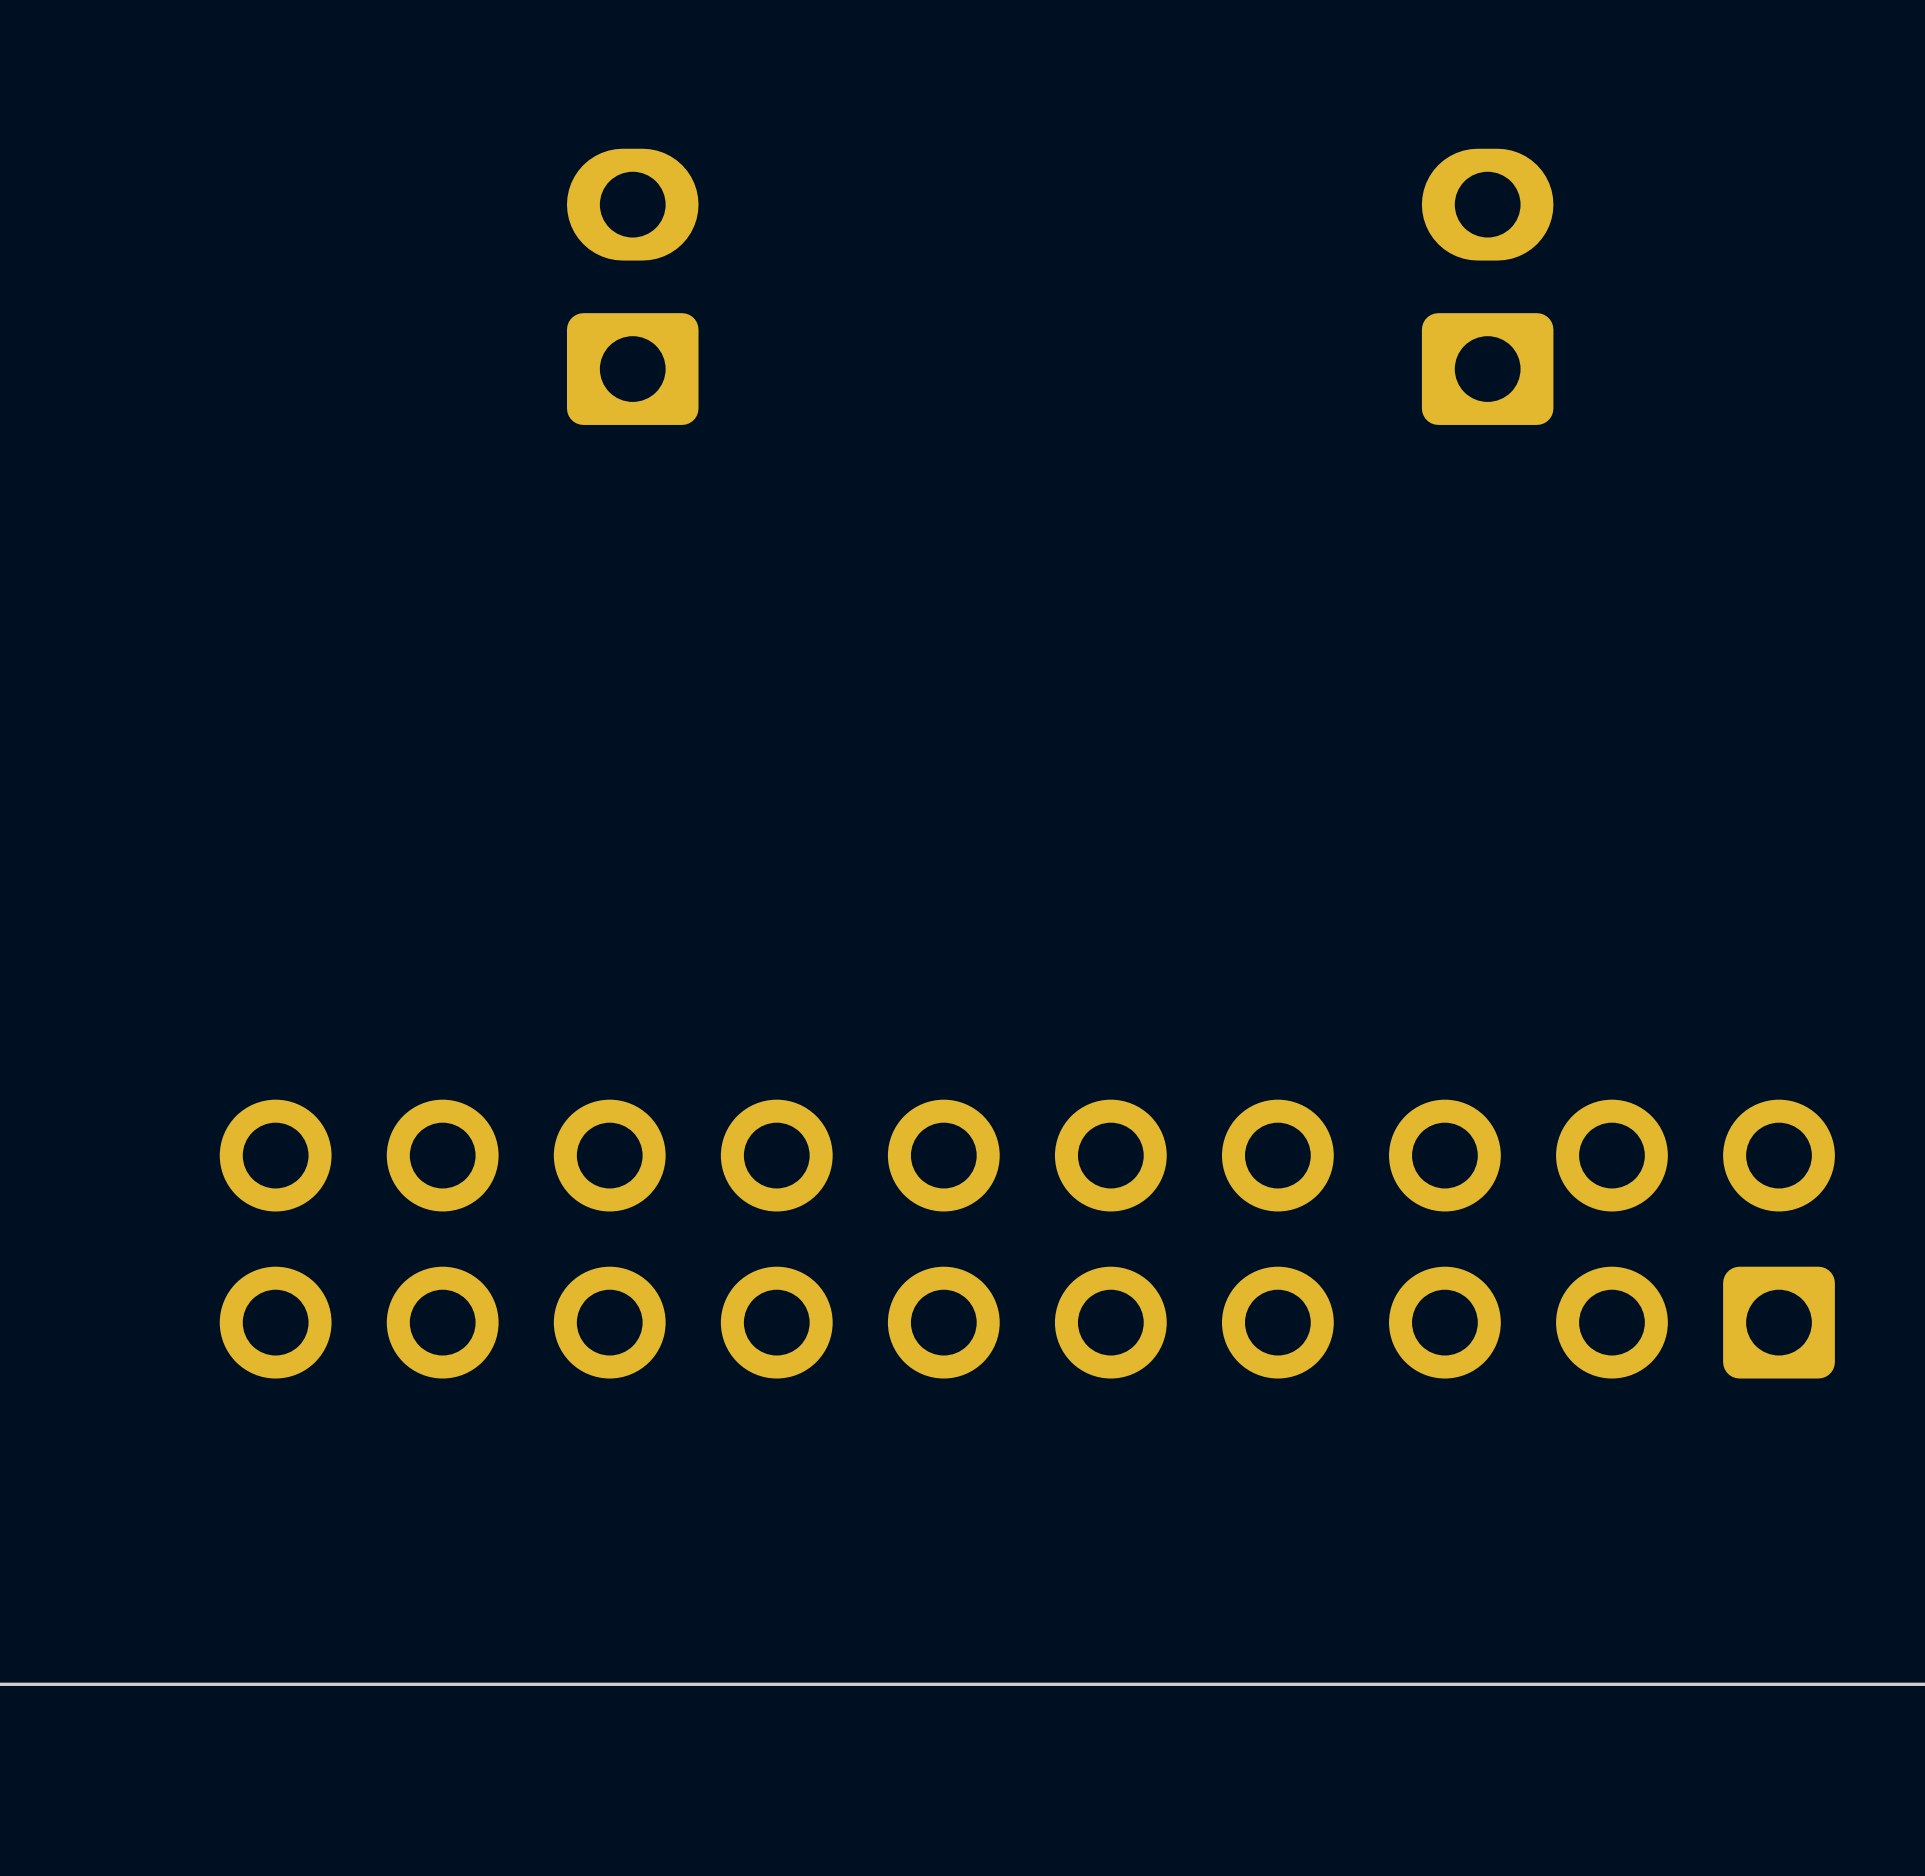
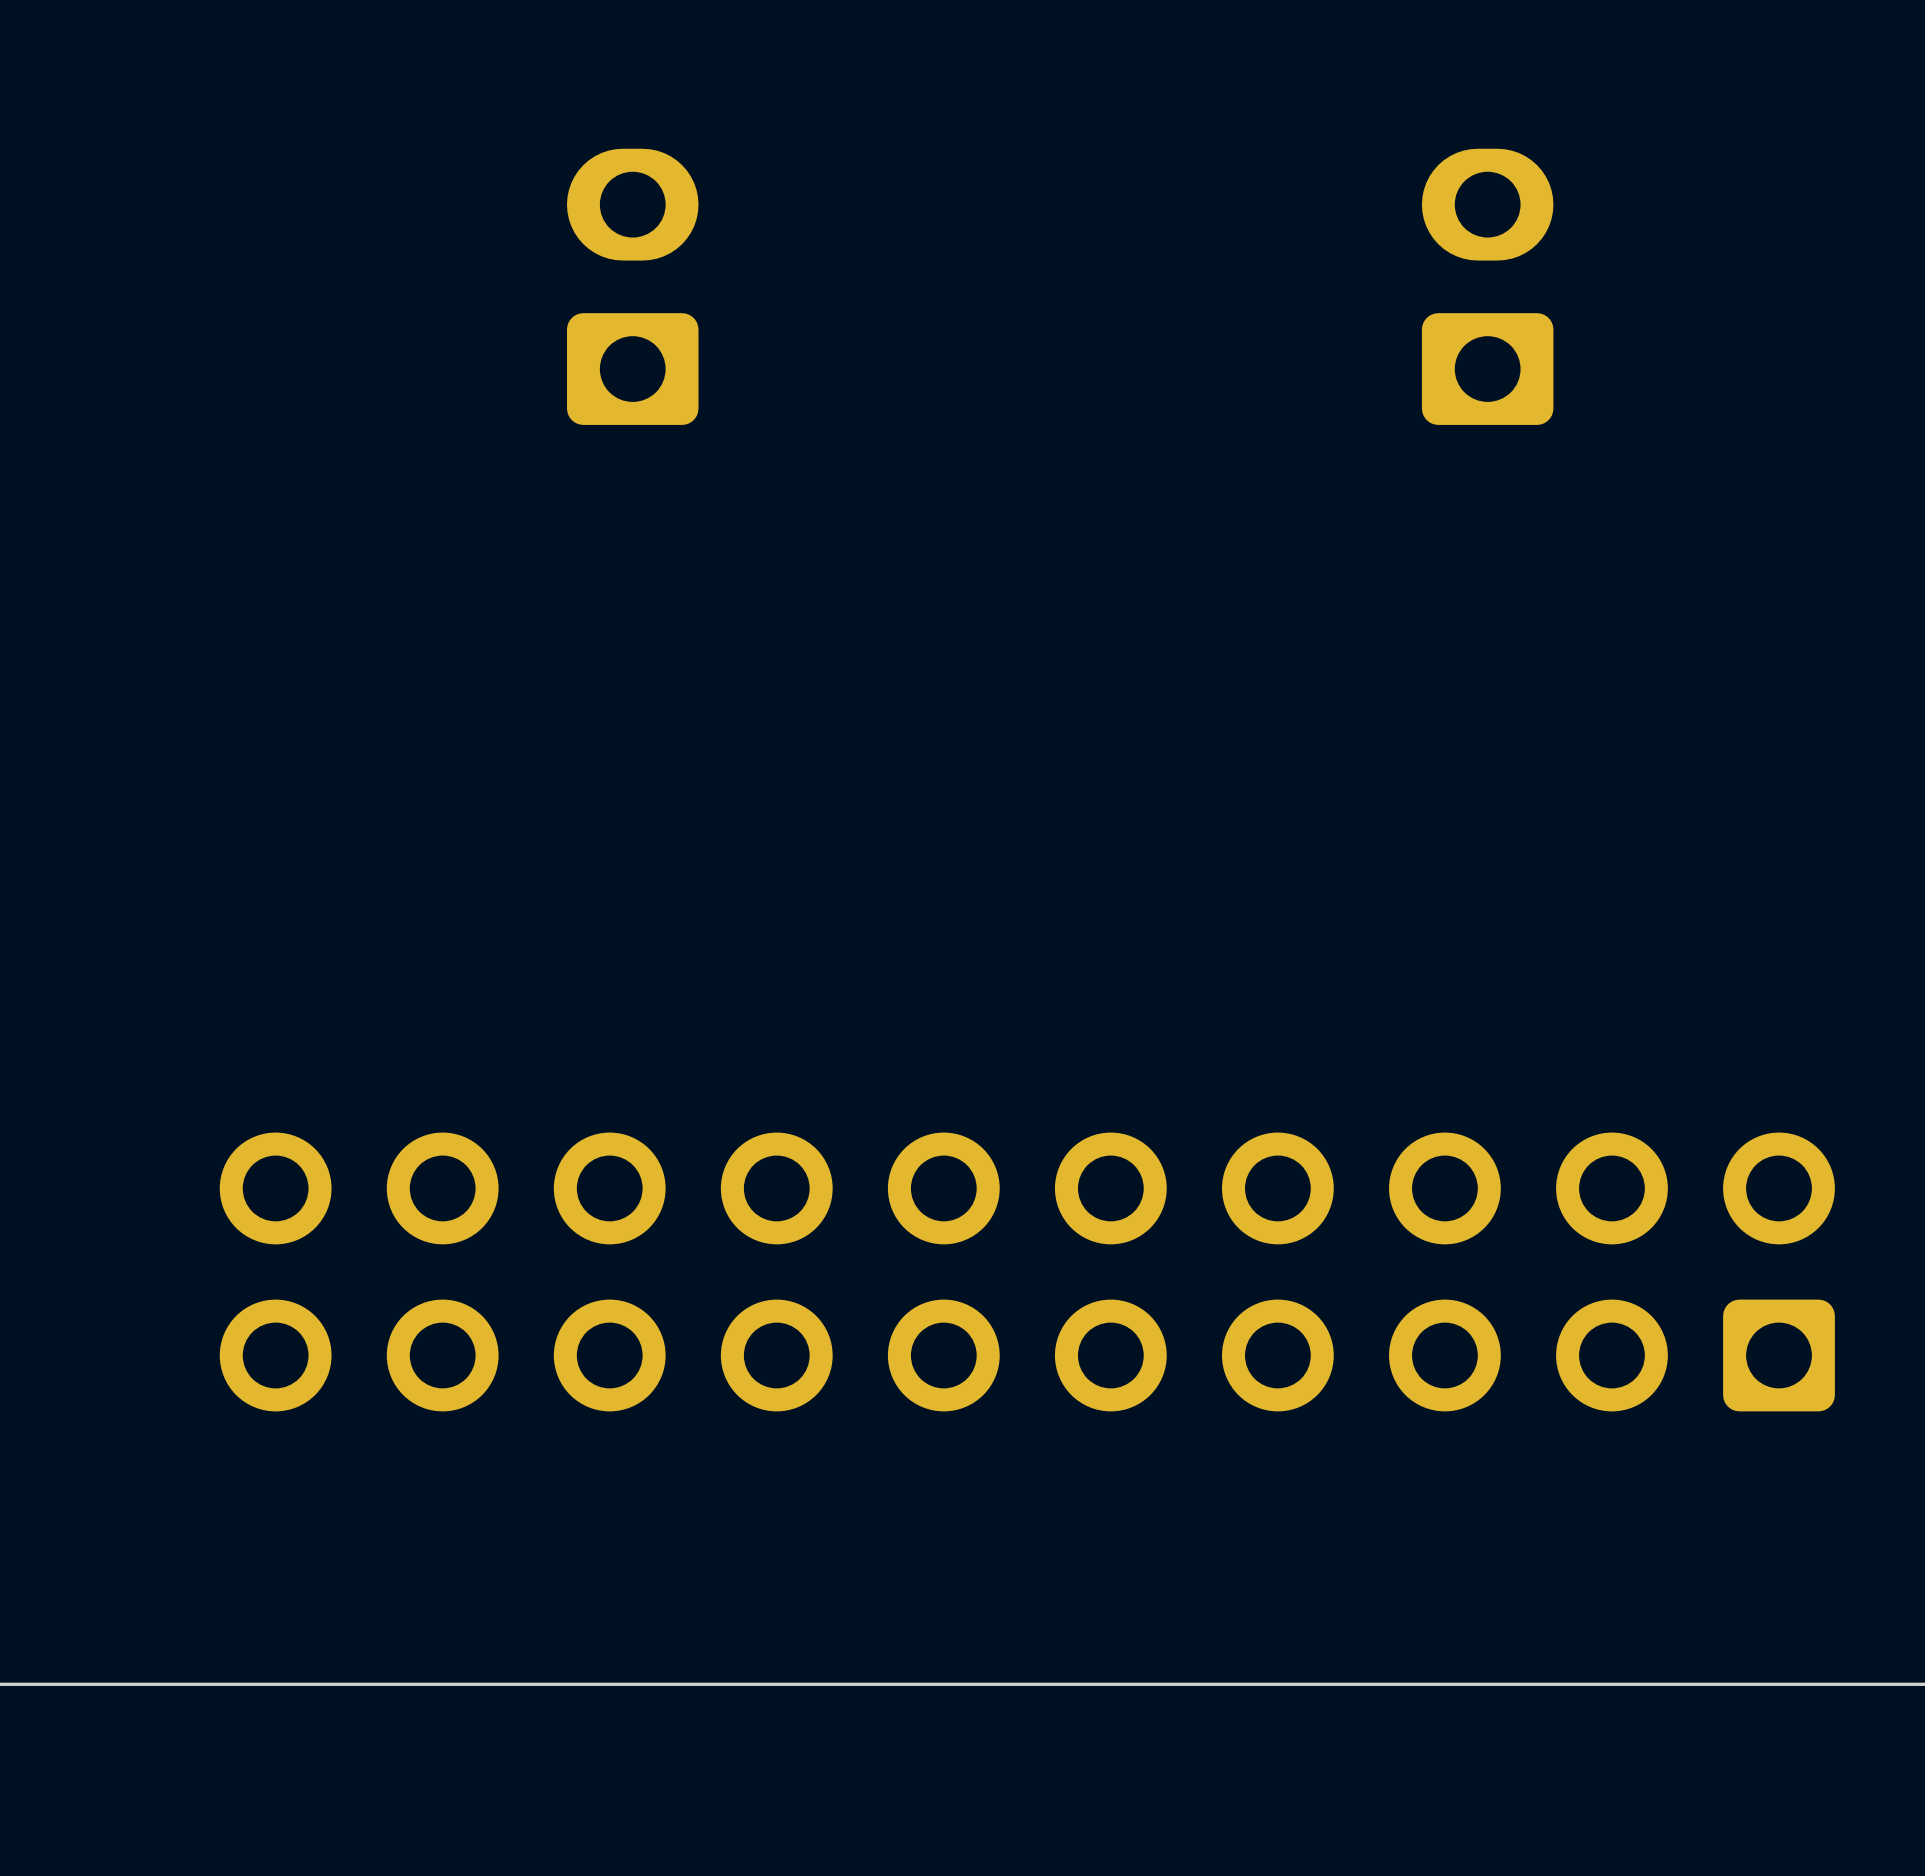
part position: (1027, 1239) -> (1027, 1271)

